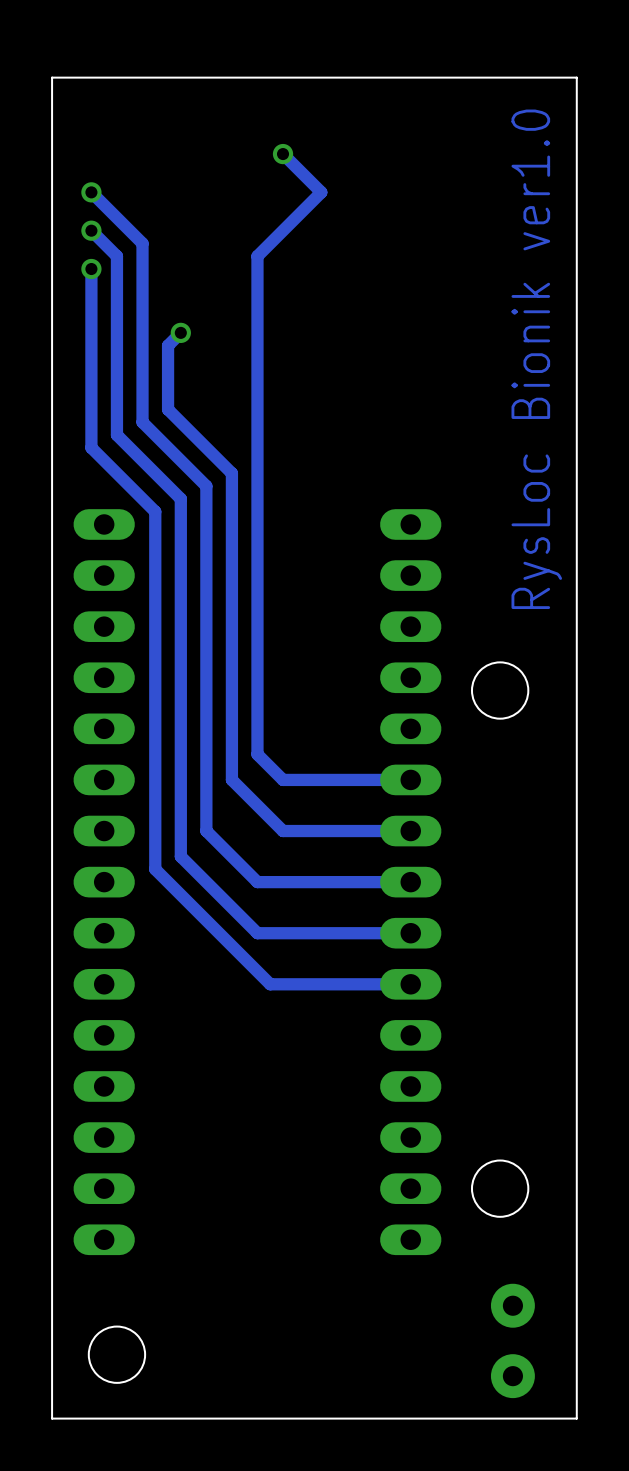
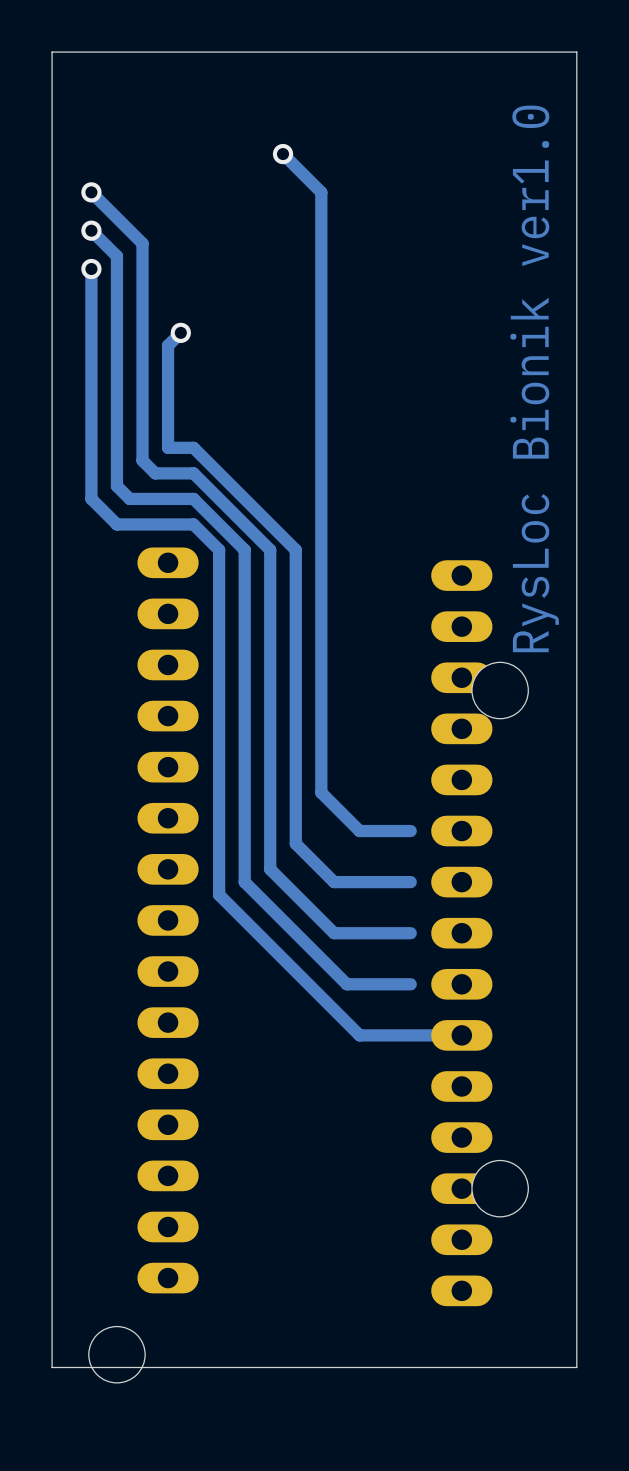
board edge: (576, 77) (52, 77) -> (576, 77) (576, 52) (52, 52) (52, 77)
track: (321, 192) (257, 256) (257, 754) (283, 779) (410, 779) -> (321, 192) (321, 792) (359, 831)
track: (168, 409) (231, 473) (231, 779) (283, 831) (359, 831) -> (168, 409) (168, 447) (193, 447) (295, 550) (295, 843) (334, 882)
track: (142, 422) (193, 473) -> (155, 473) (193, 473)
track: (116, 435) (142, 460) -> (142, 422) (142, 460)
track: (91, 447) (155, 511) (155, 869) (270, 984) (346, 984) -> (116, 435) (116, 486) (129, 498) (193, 498) (244, 550) (244, 882) (346, 984)
track: (155, 473) (180, 498) (180, 856) (219, 894) -> (91, 447) (91, 498) (116, 524) (193, 524) (219, 550) (219, 894)
track: (206, 486) (206, 831) (257, 882) (334, 882) -> (206, 486) (270, 550) (270, 869) (334, 933)
part position: (104, 882) -> (168, 920)
part position: (410, 882) -> (461, 933)
track: (334, 933) (257, 933) -> (461, 1035) (359, 1035) (257, 933)
part: (512, 1340) -> none
board edge: (576, 1367) (576, 1418) (52, 1418) (52, 1367) -> (576, 1367) (52, 1367)

